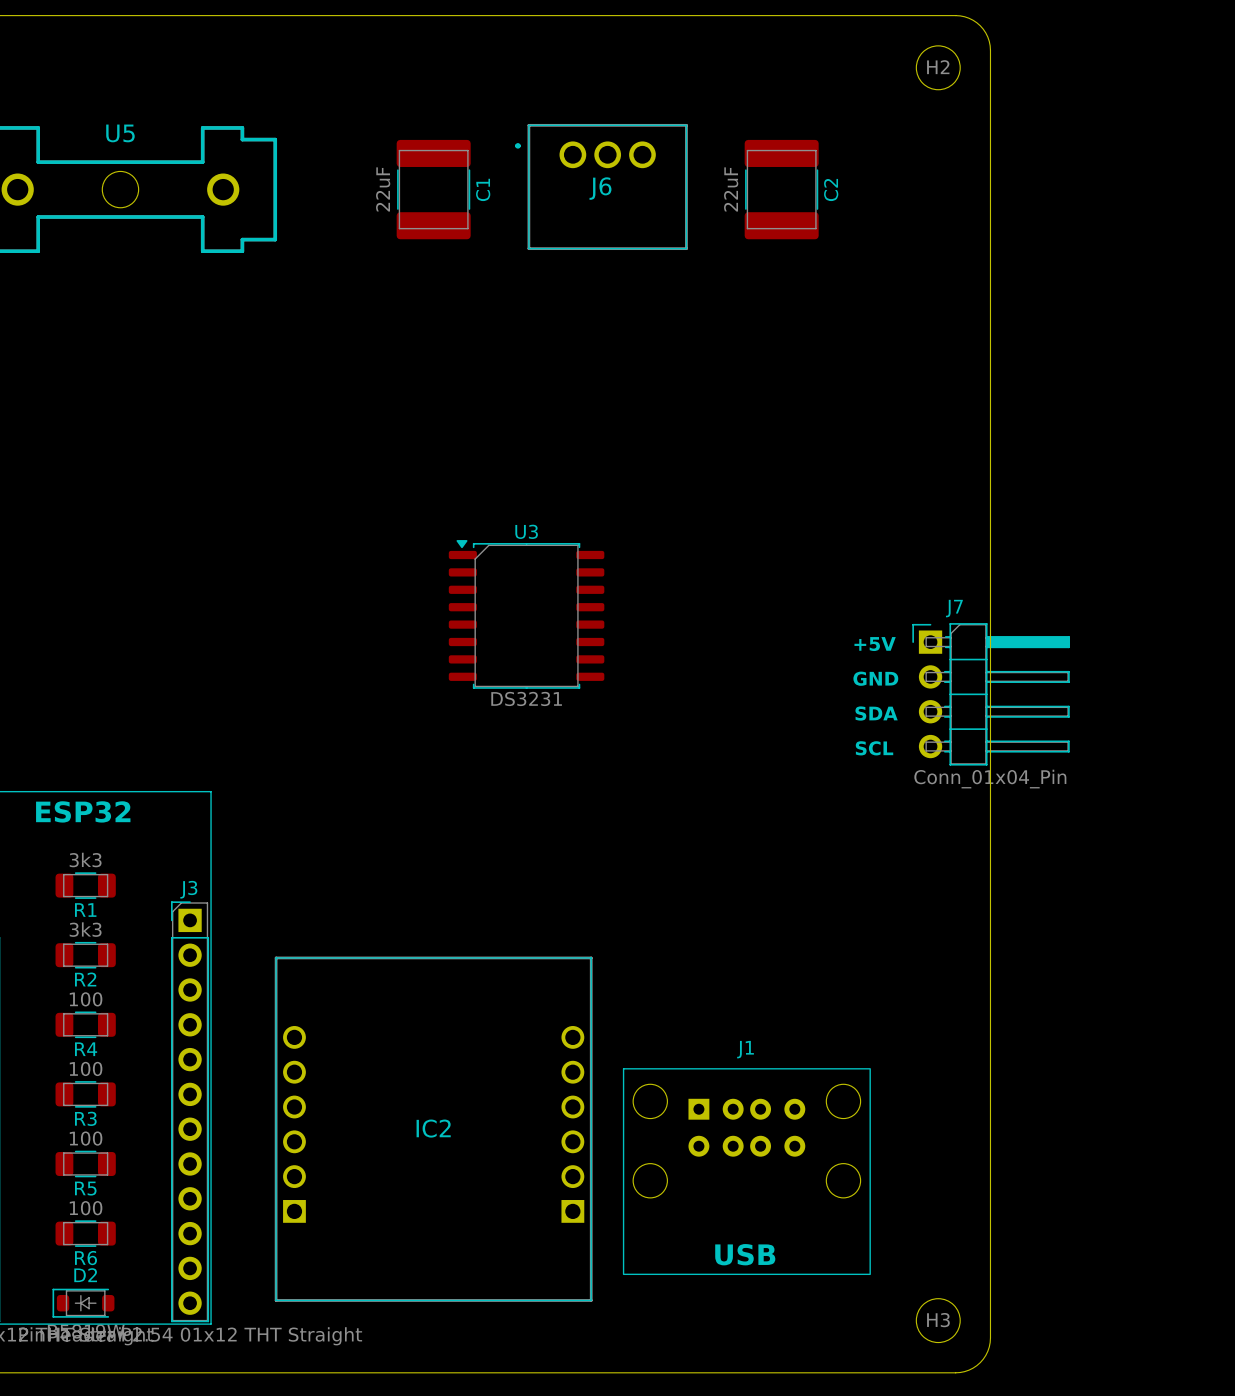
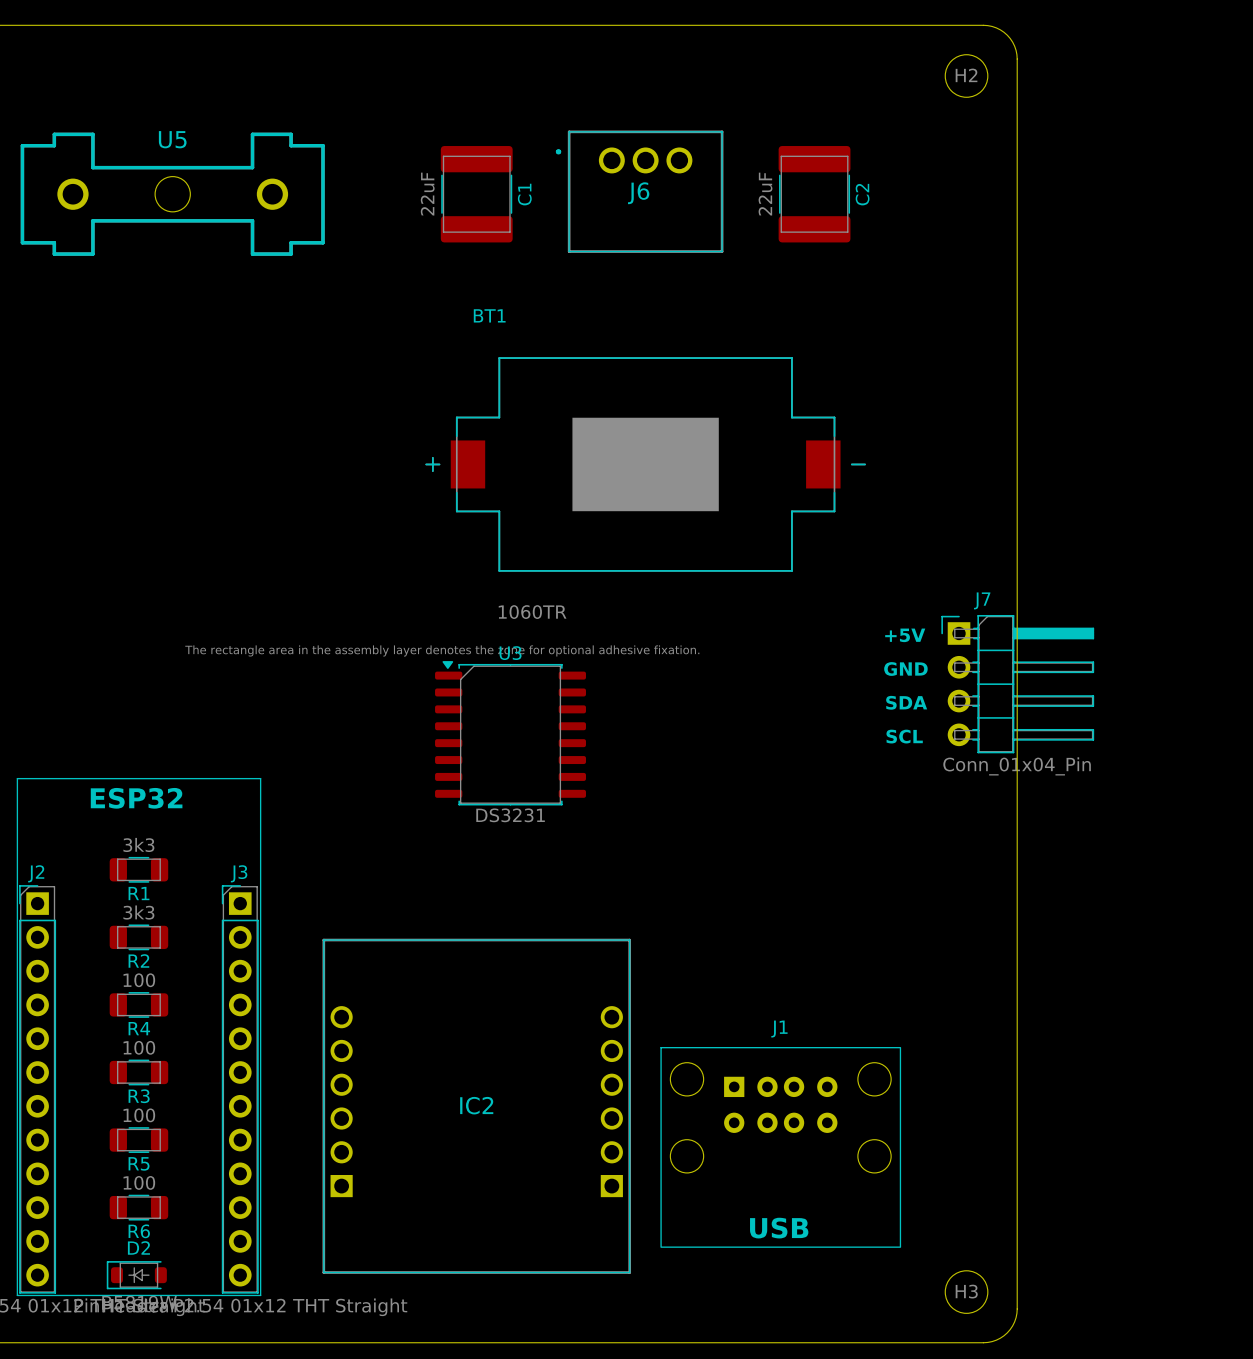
BT1: none -> 1060TR (645, 464)
U3 position: (526, 614) -> (510, 733)

